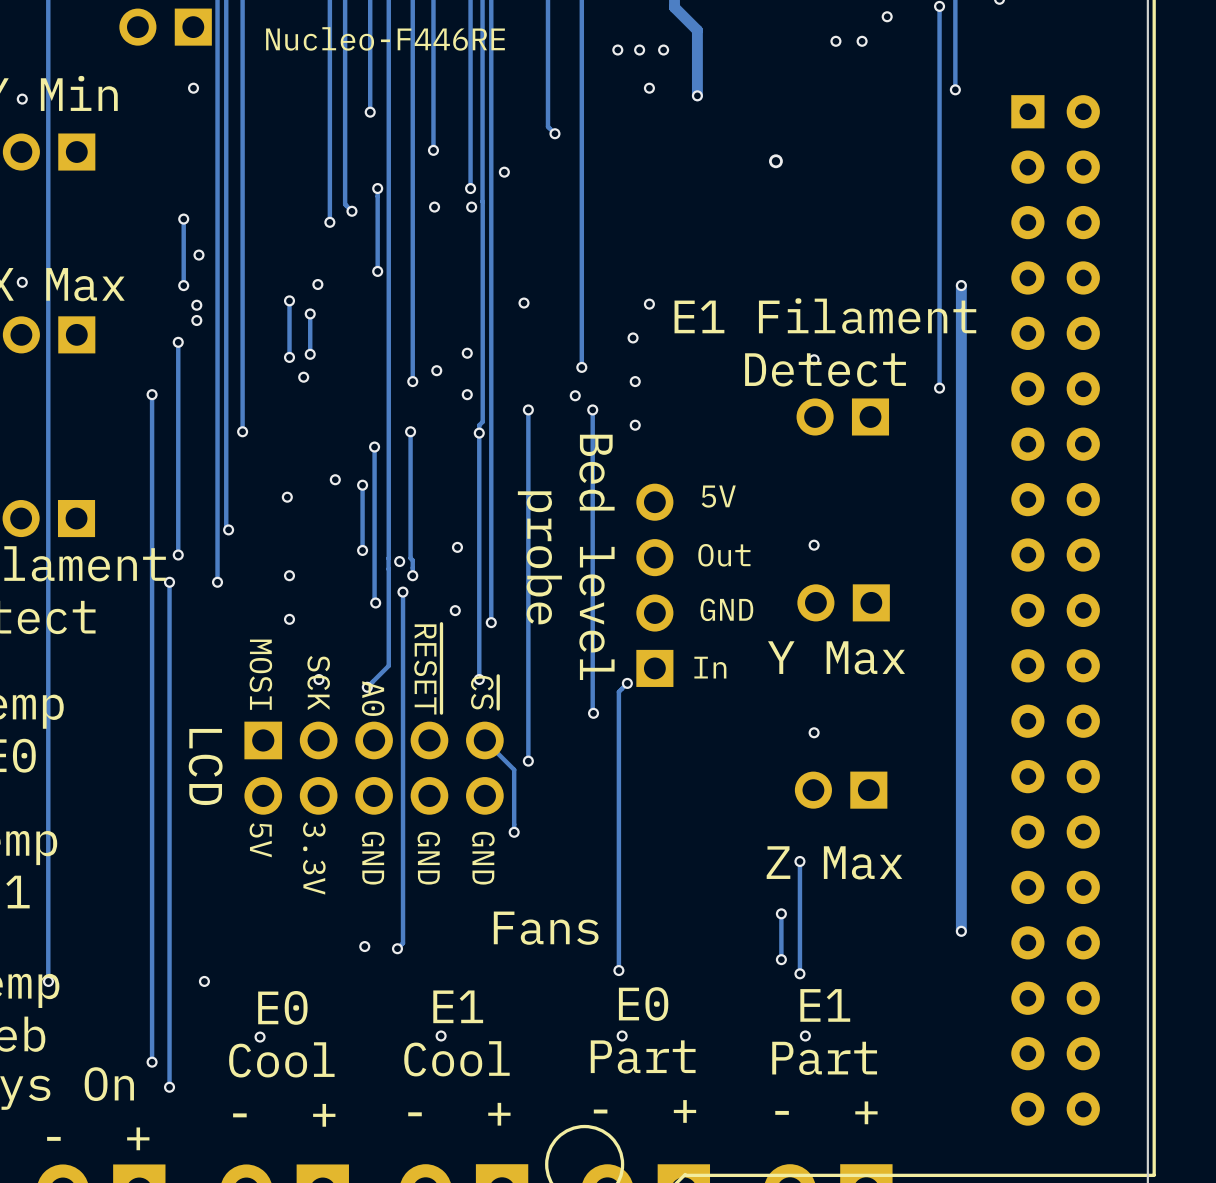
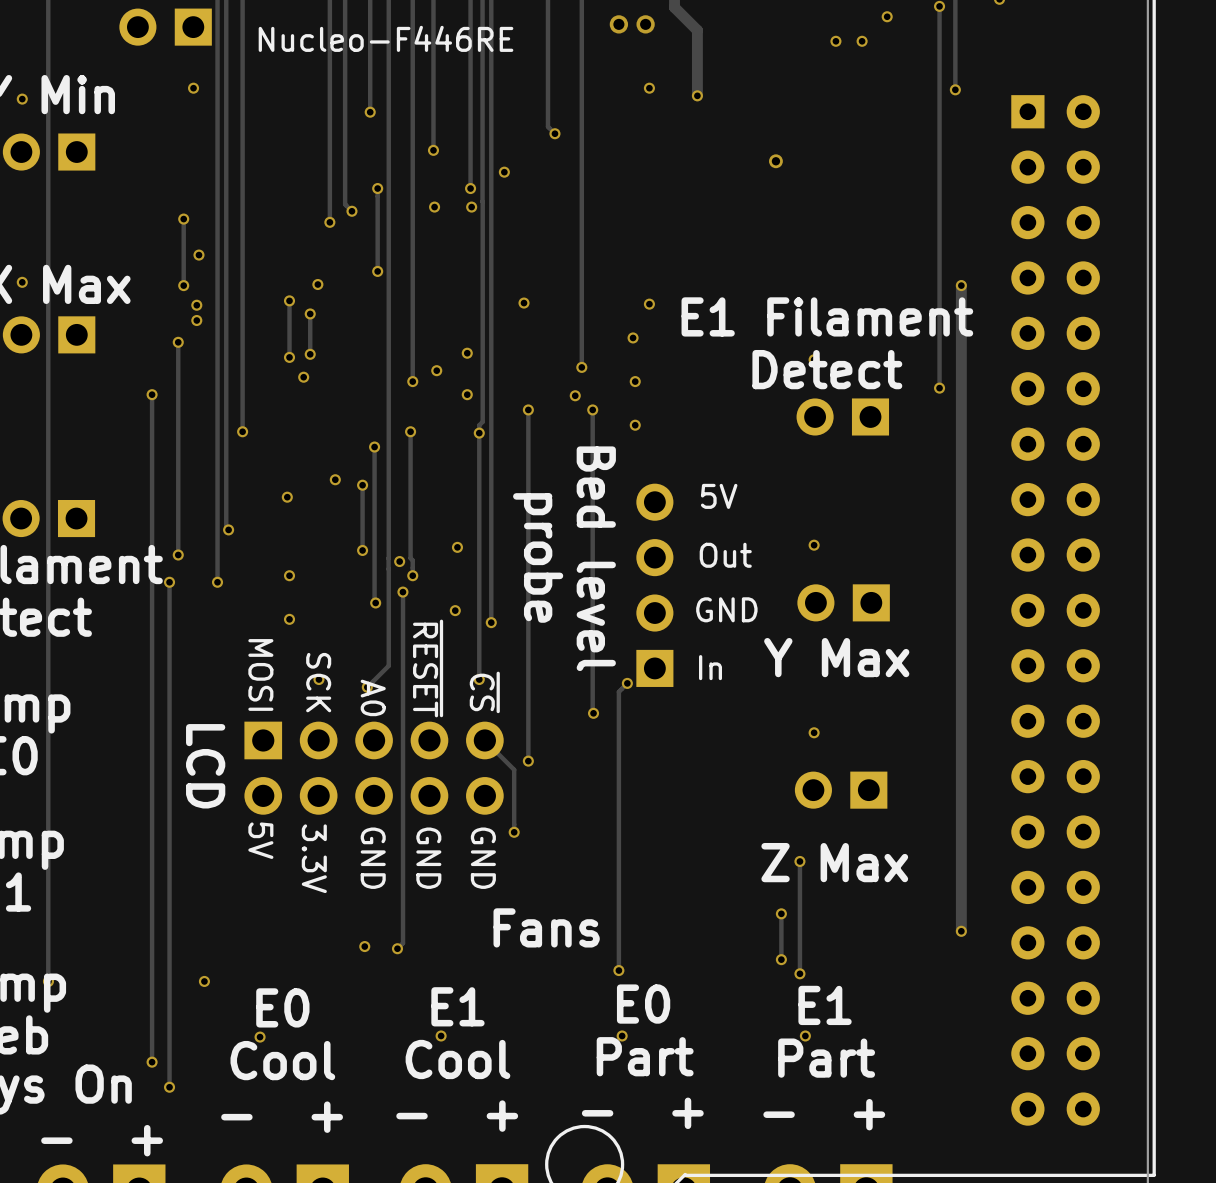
via: none -> (618, 24)
via: none -> (645, 24)
via: (617, 50) -> none
via: (639, 50) -> none
via: (663, 50) -> none

